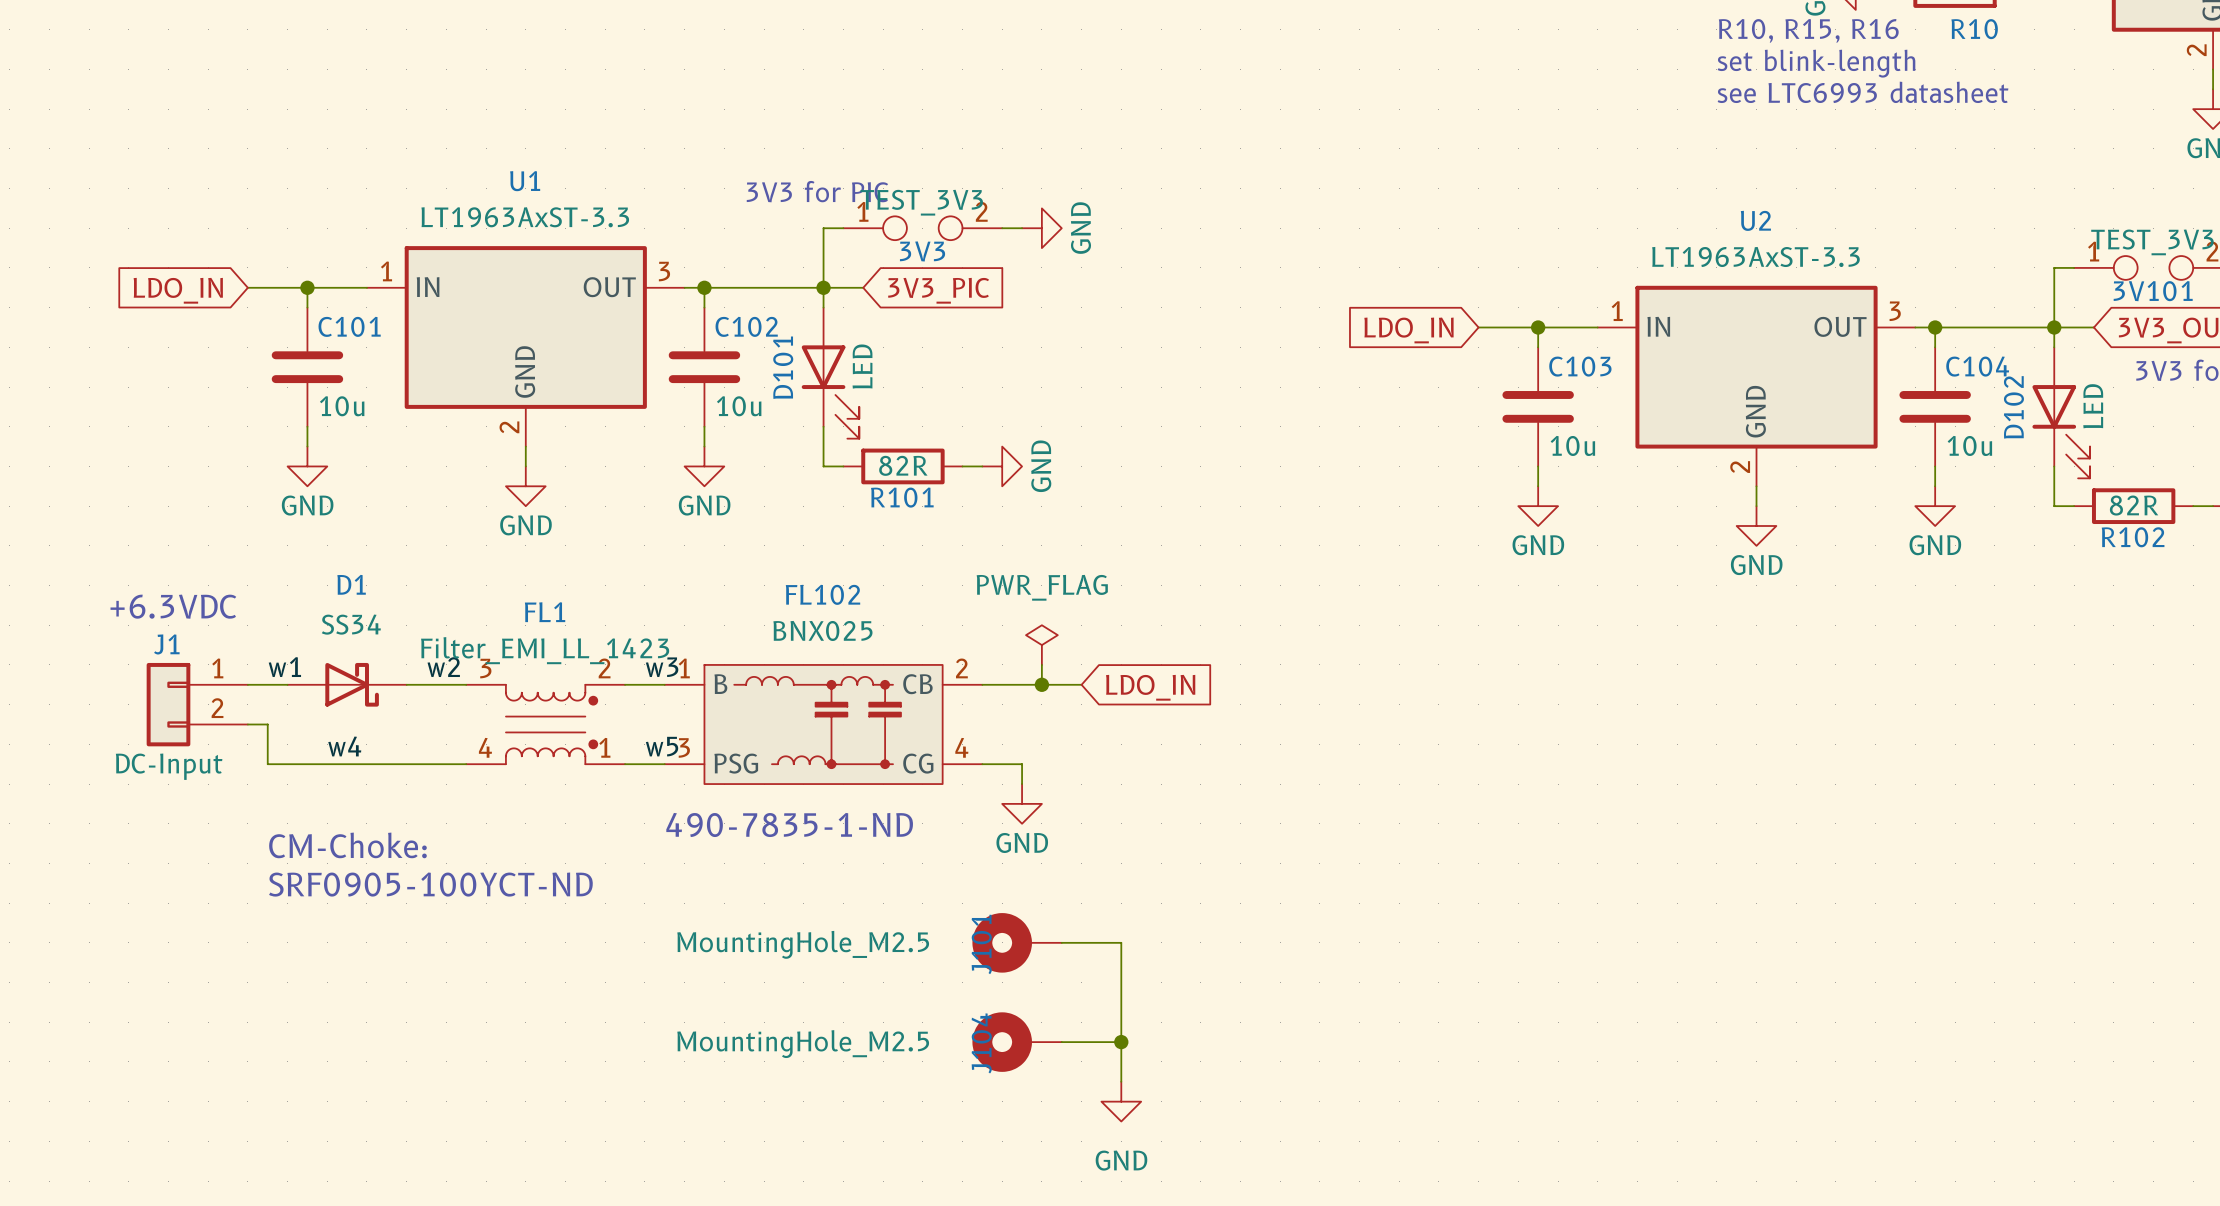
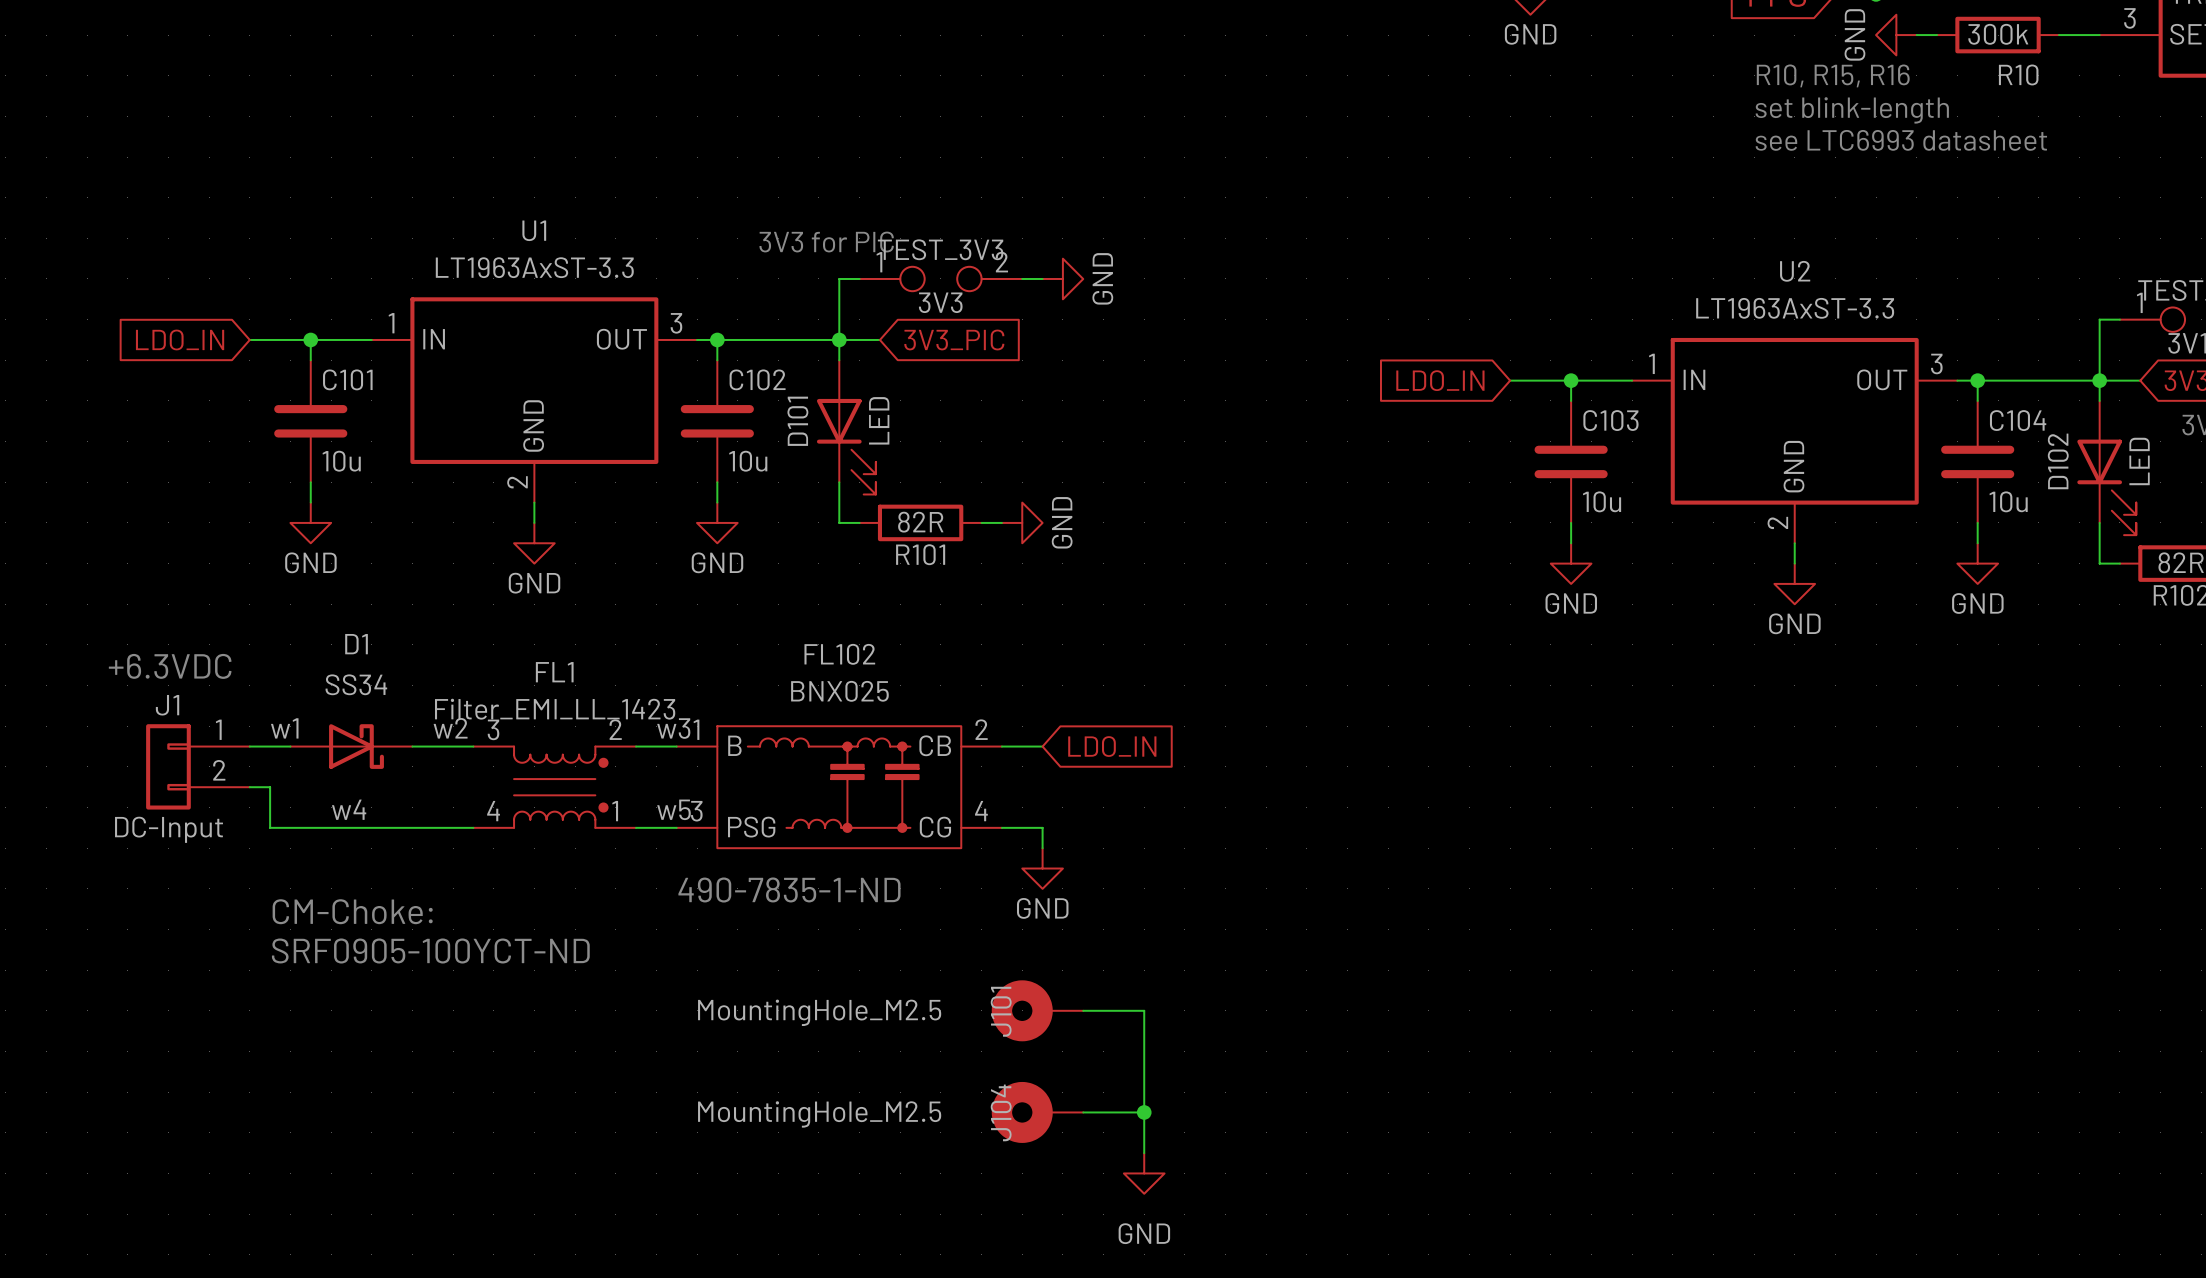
power symbol: PWR_FLAG (1041, 645) -> none
wire: (1041, 664) (1041, 684) -> none
wire: (1022, 684) (1081, 684) -> none
junction: (1041, 684) -> none
global label position: LDO_IN (1150, 687) -> LDO_IN (1112, 746)

